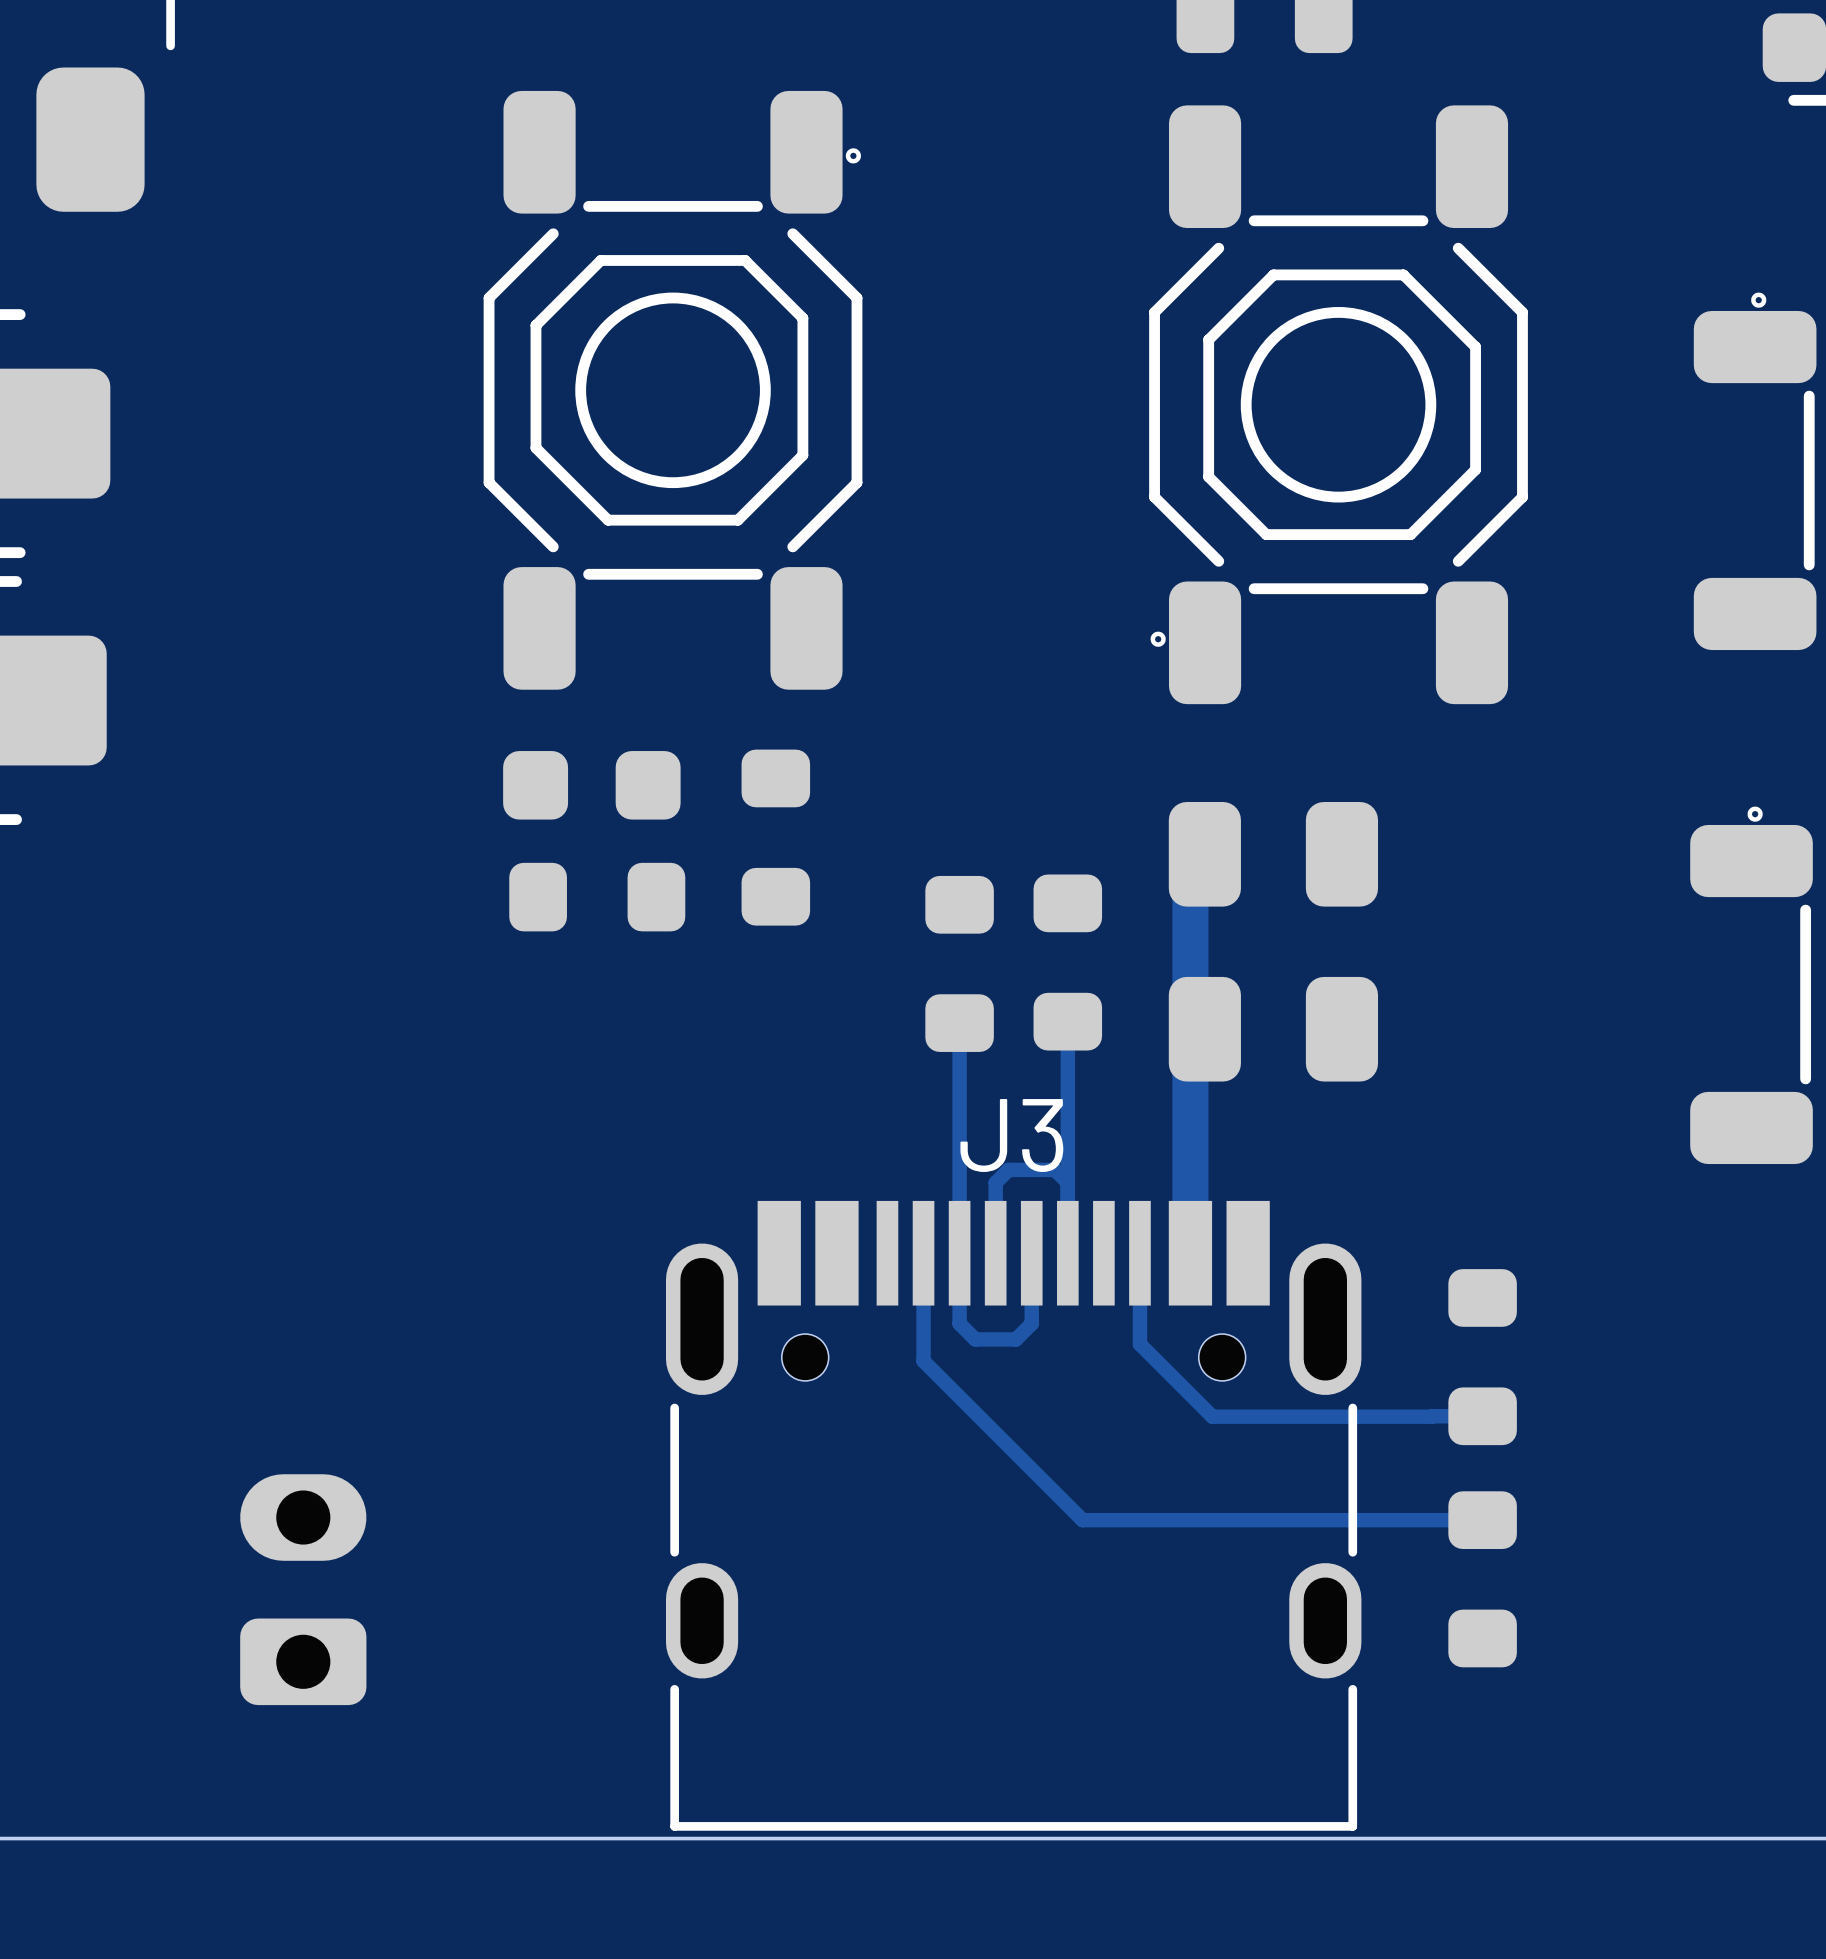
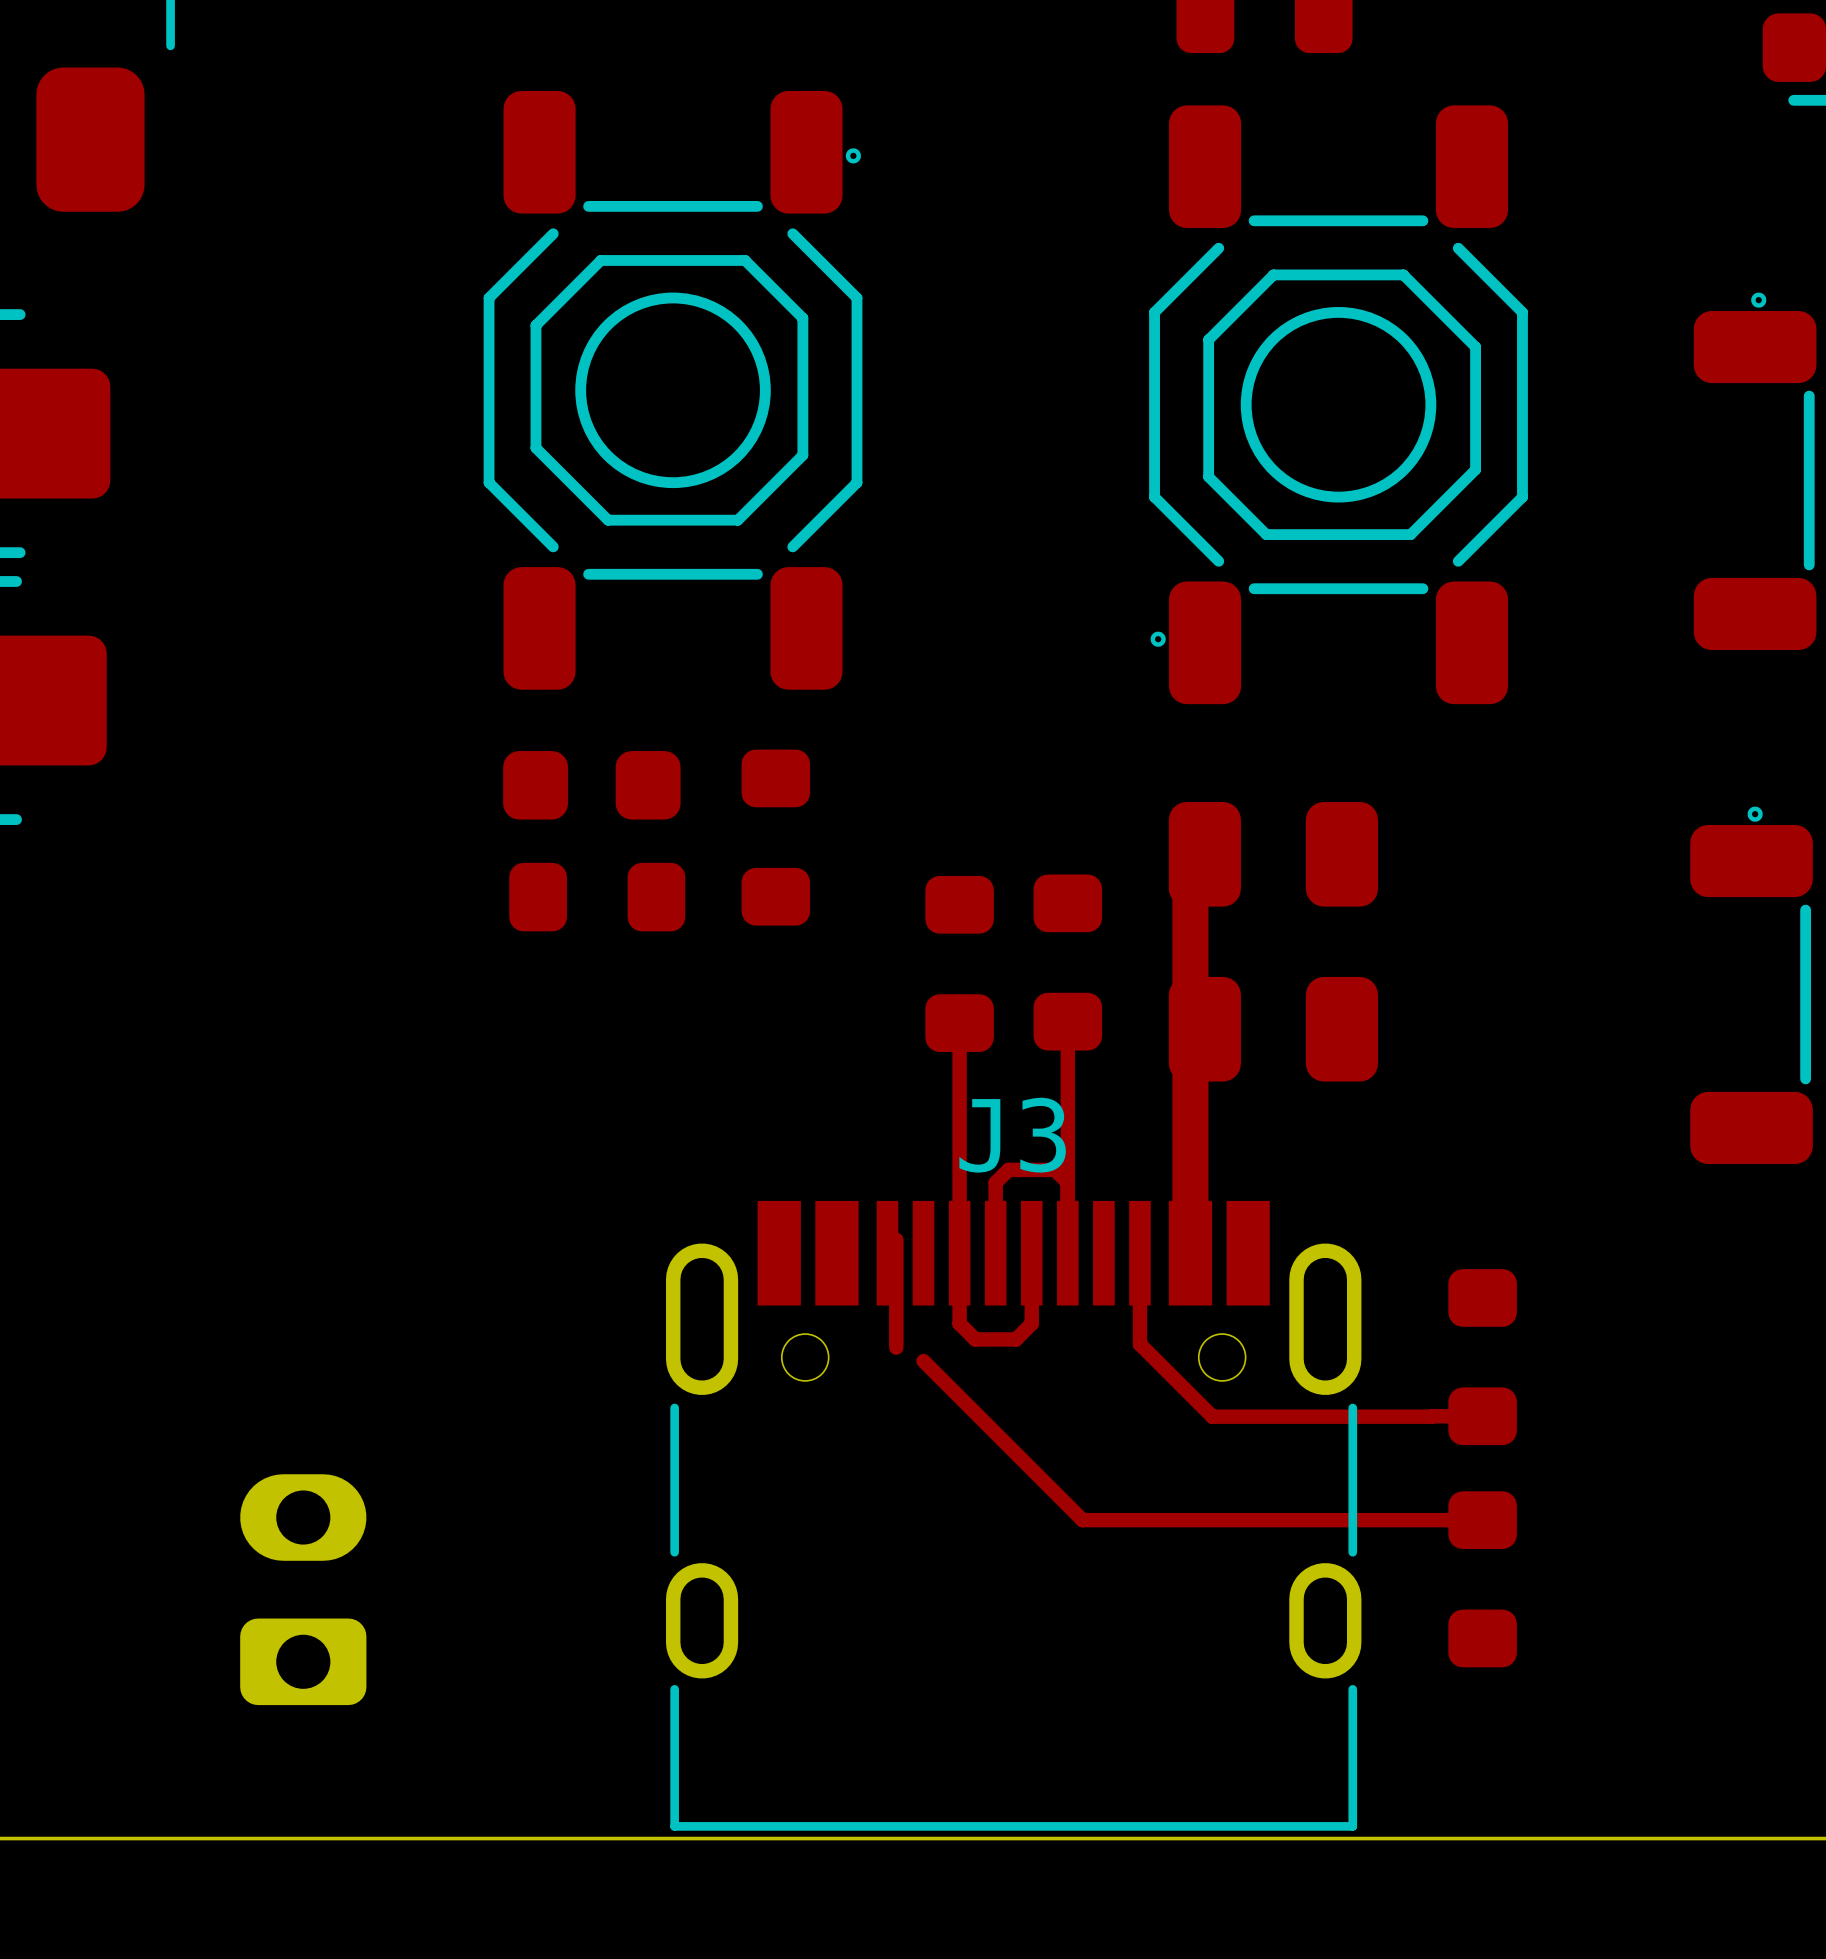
track: (923, 1253) (923, 1361) -> (896, 1239) (896, 1347)

